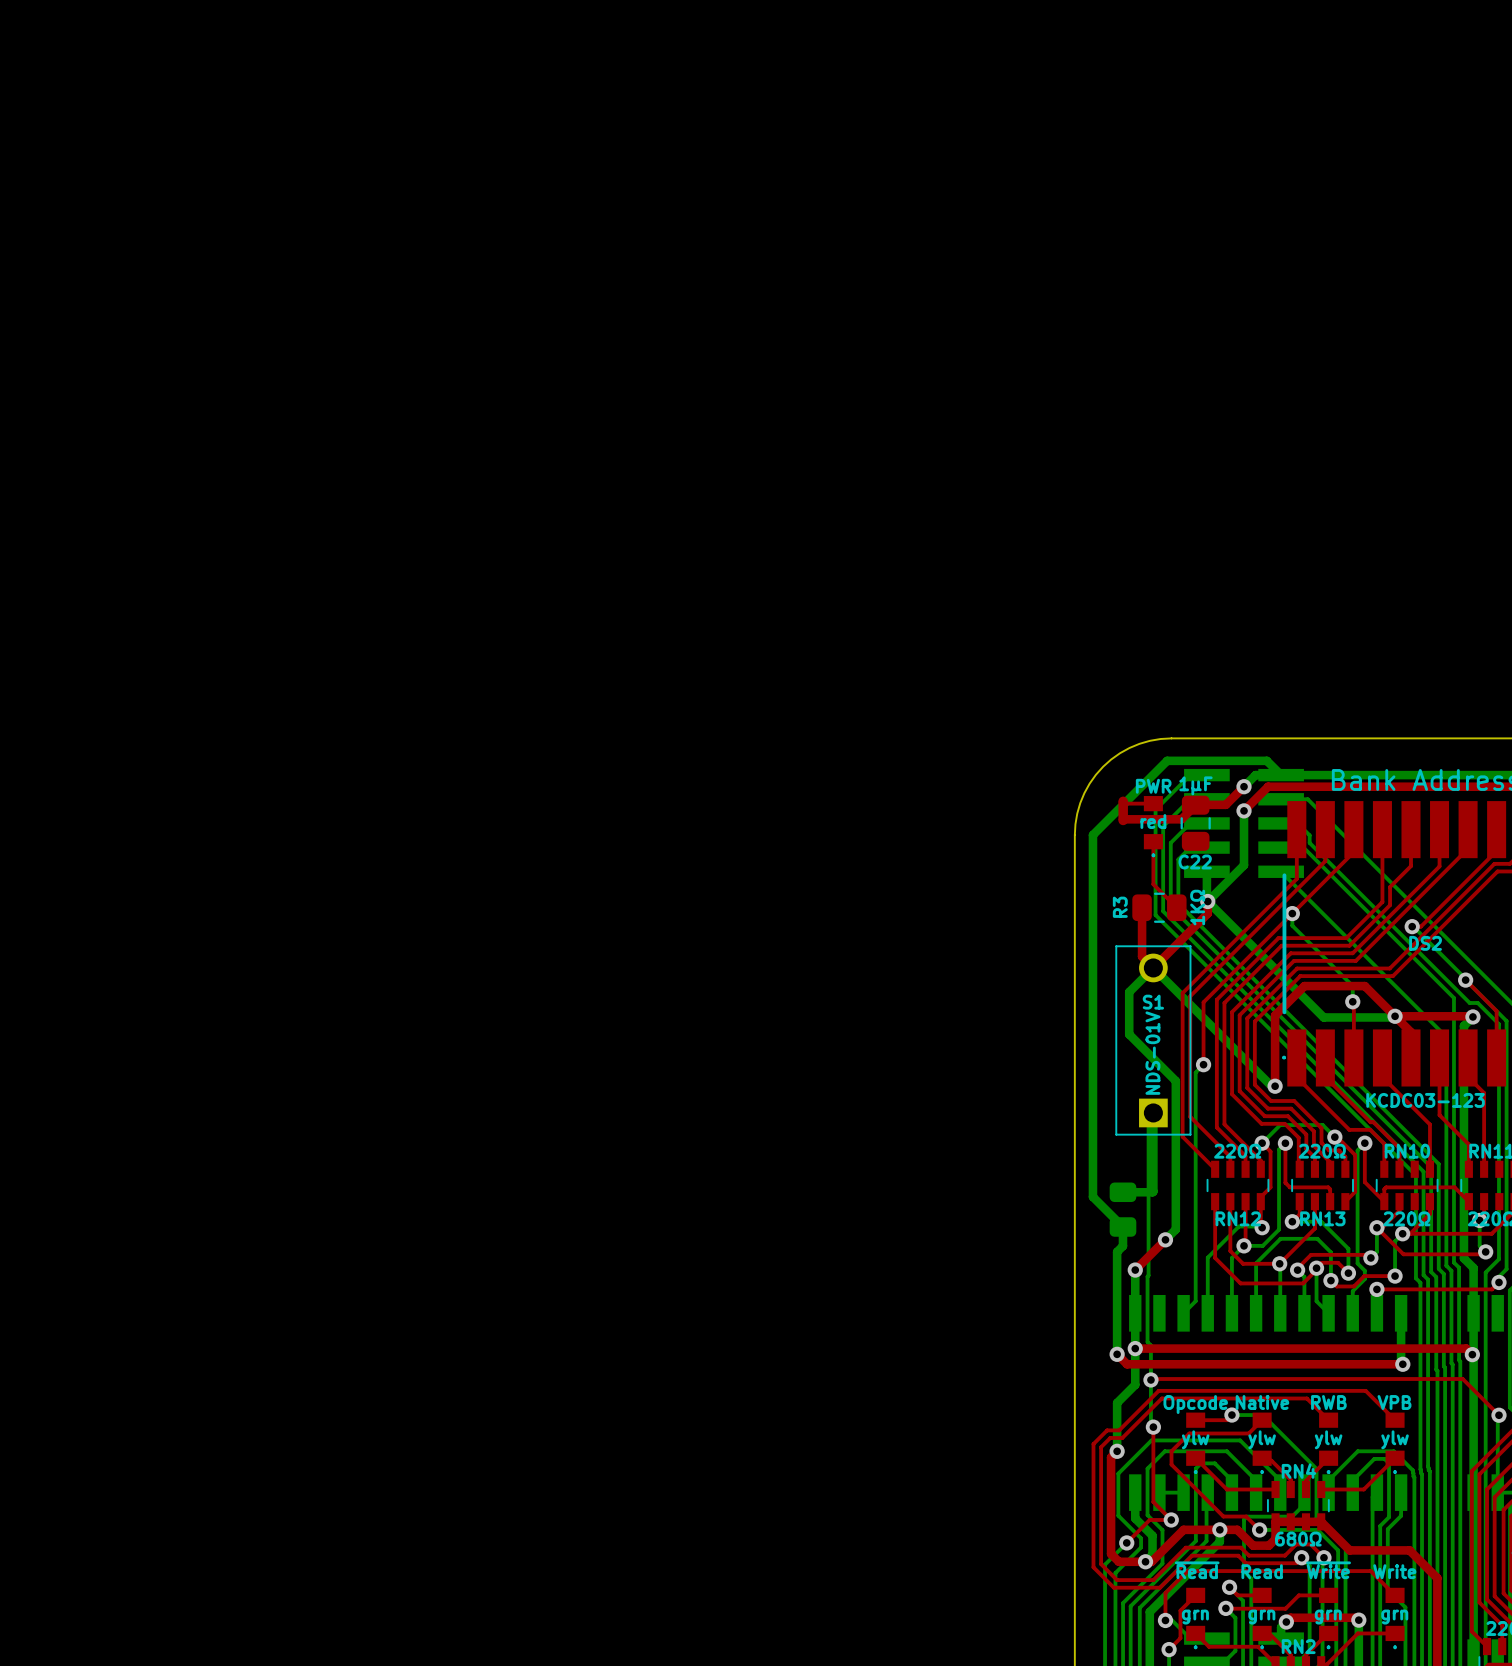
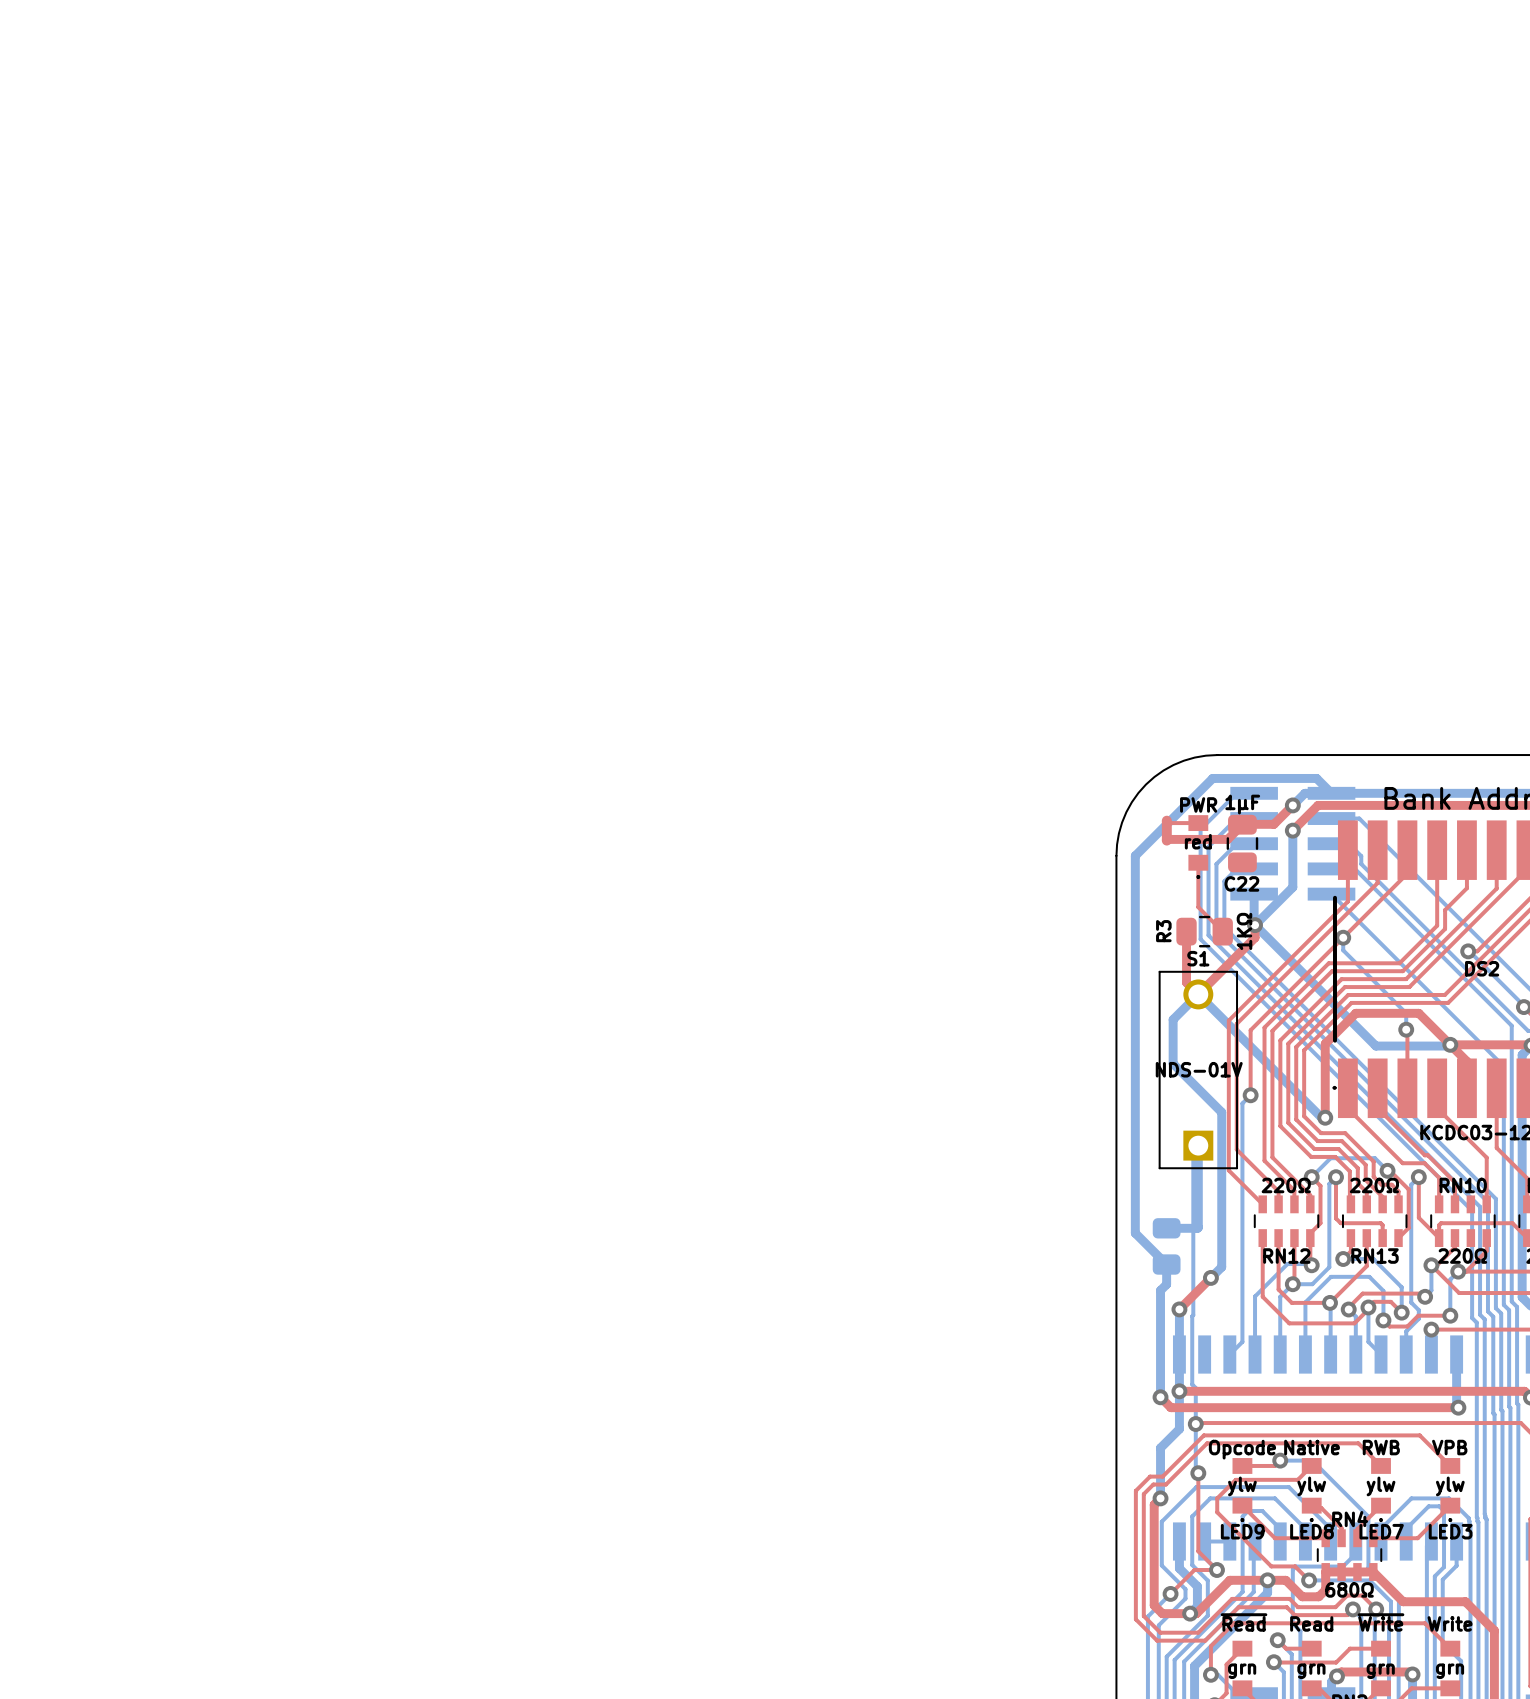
S1 name position: S1 (1153, 1002) -> S1 (1198, 958)
S1 value rotation: 0° (1152, 1053) -> 90° clockwise (1199, 1069)
LED9 name: none -> LED9 (1242, 1531)
LED8 name: none -> LED8 (1312, 1531)
LED7 name: none -> LED7 (1381, 1531)
LED3 name: none -> LED3 (1450, 1531)

